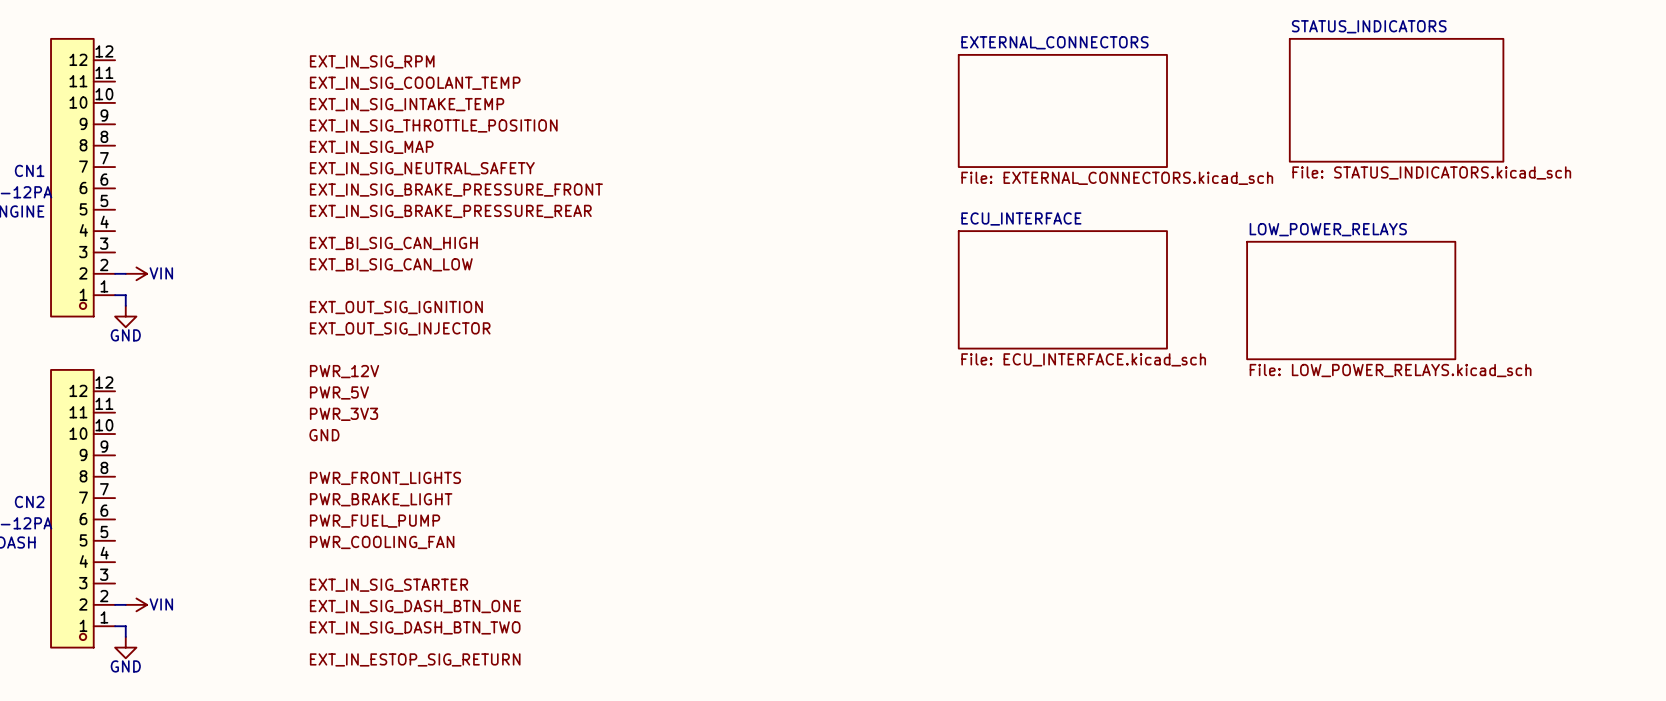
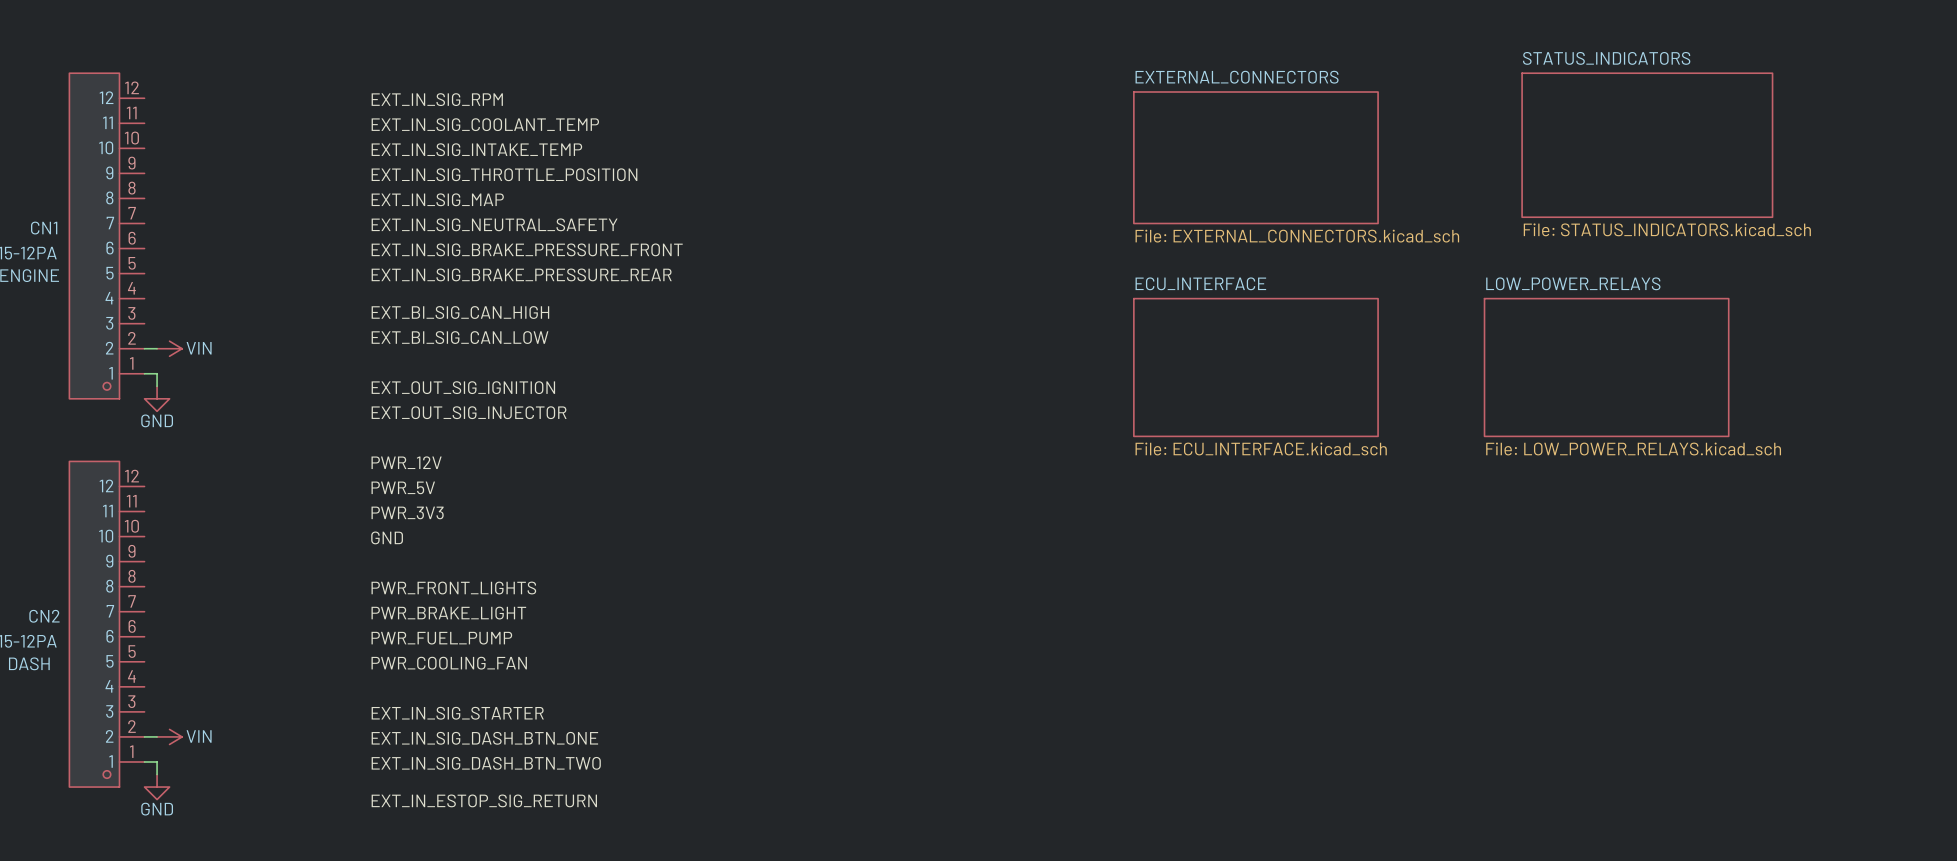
sheet LOW_POWER_RELAYS position: (1351, 300) -> (1606, 367)

